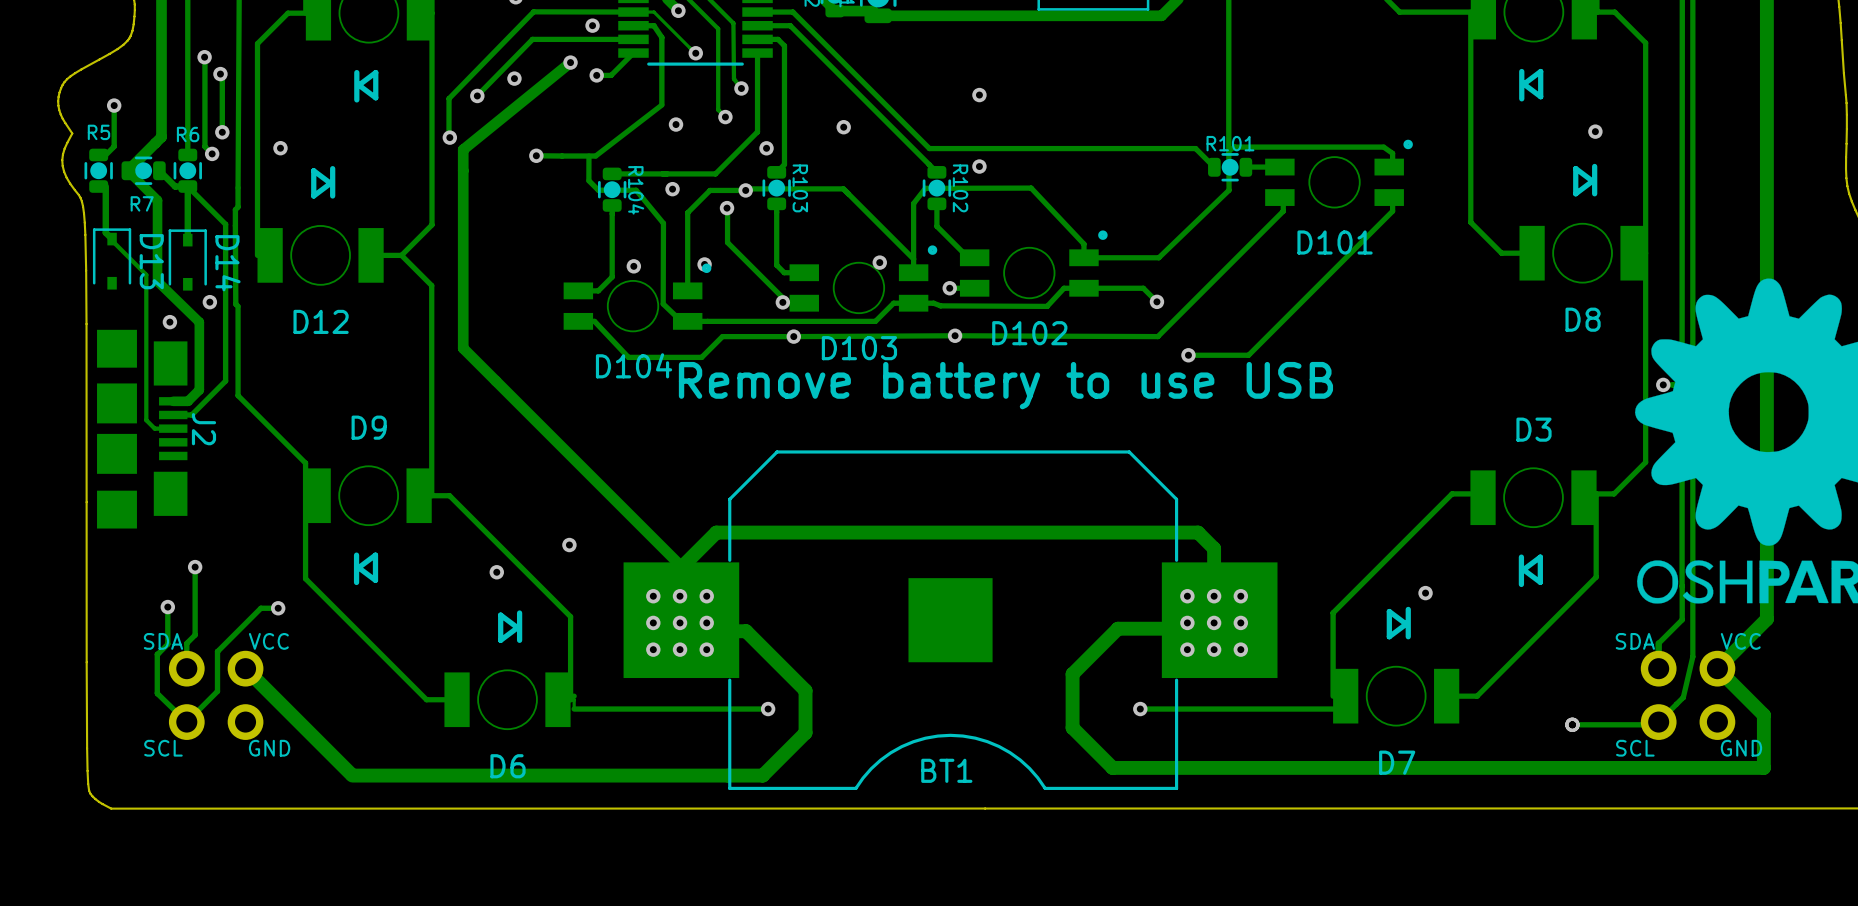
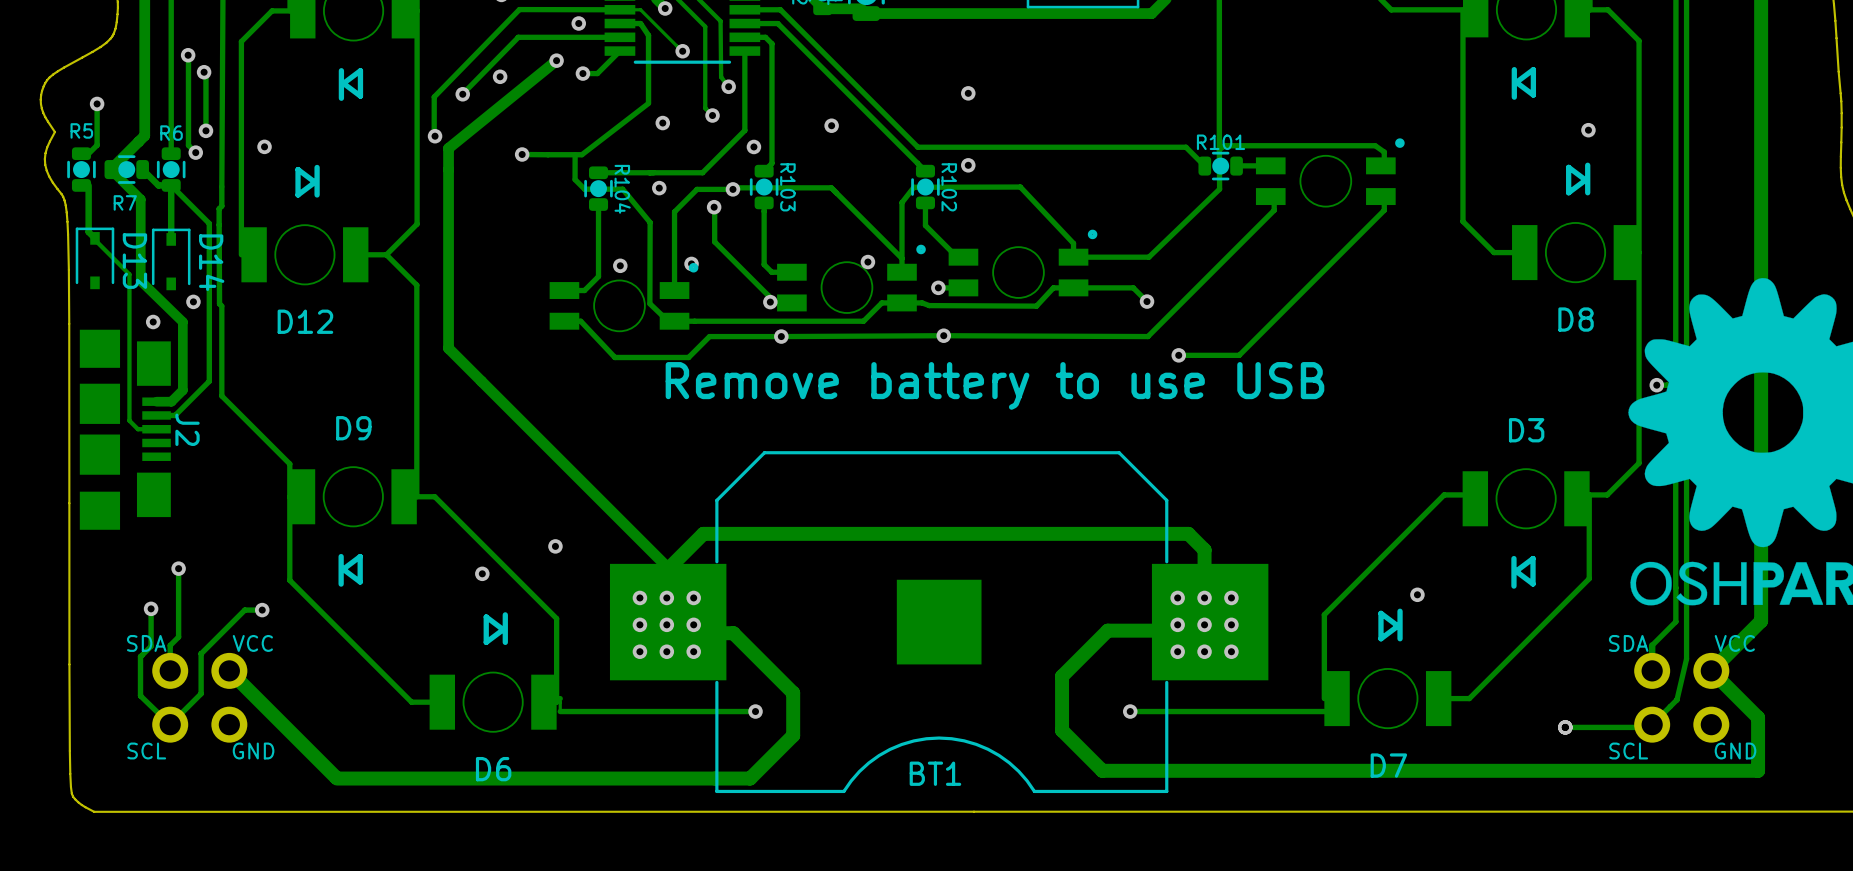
D101 name: D101 (1335, 242) -> none
D102 name: D102 (1029, 333) -> none
D103 name: D103 (859, 348) -> none
D104 name: D104 (634, 365) -> none

